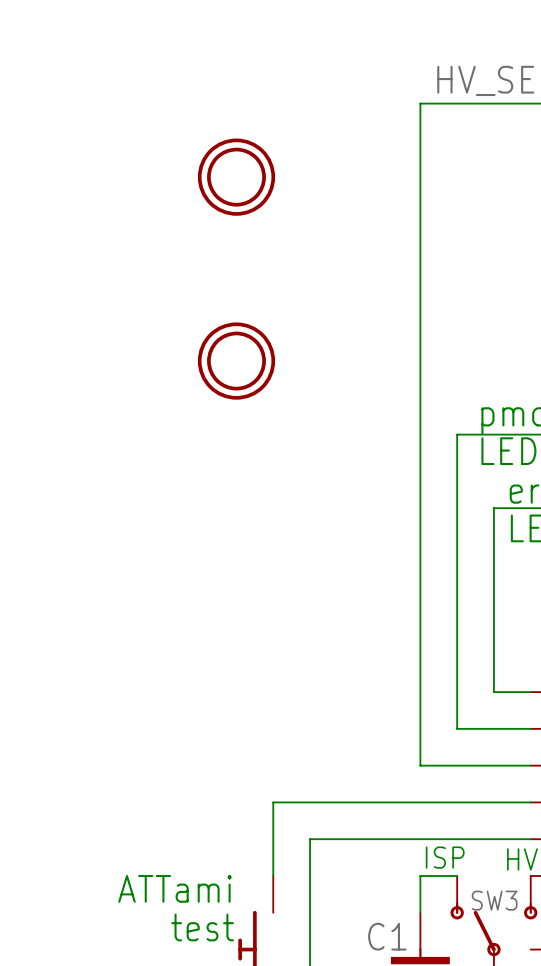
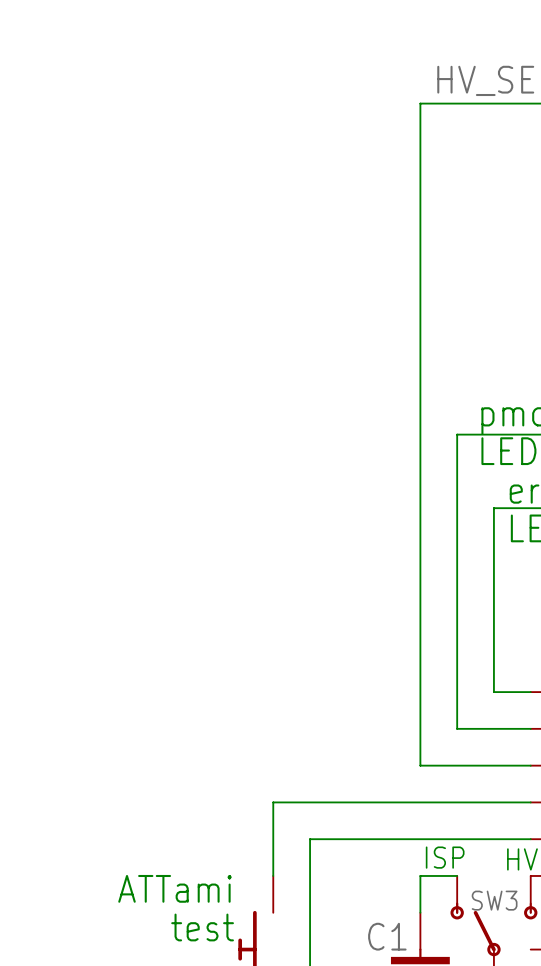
part: (236, 177) -> none
part: (236, 361) -> none

